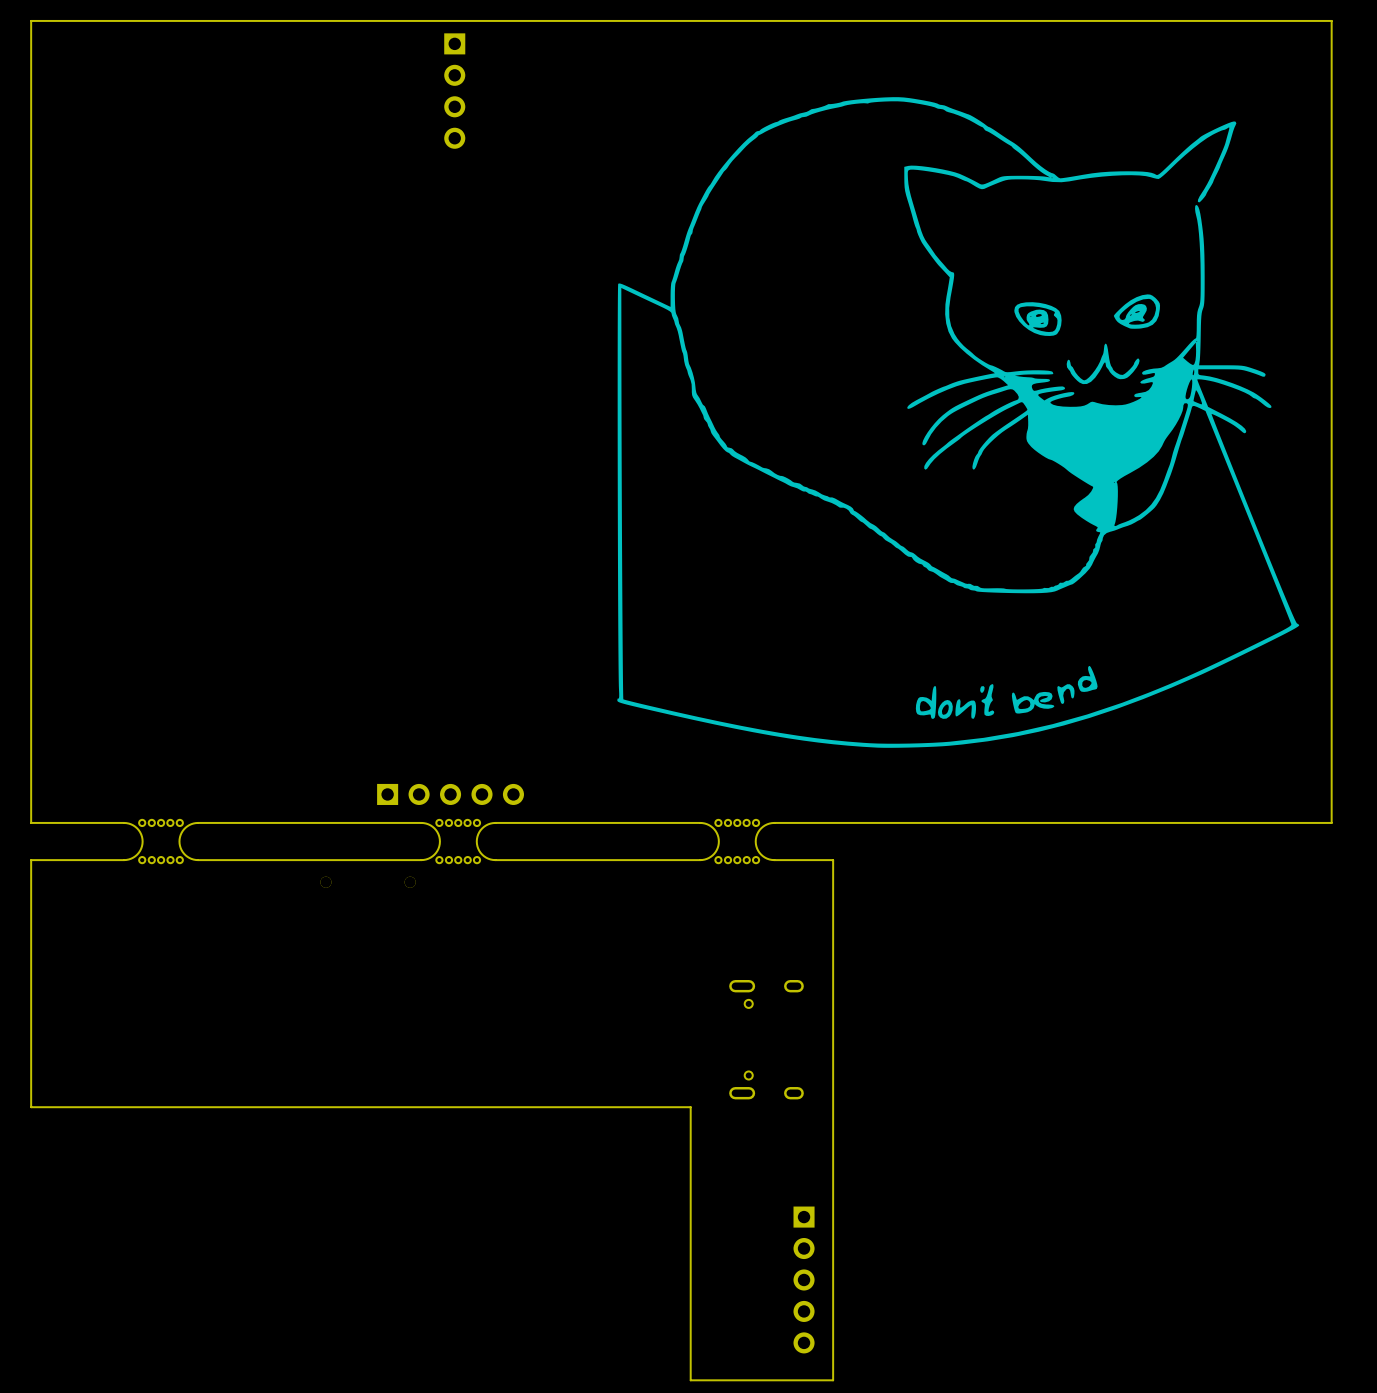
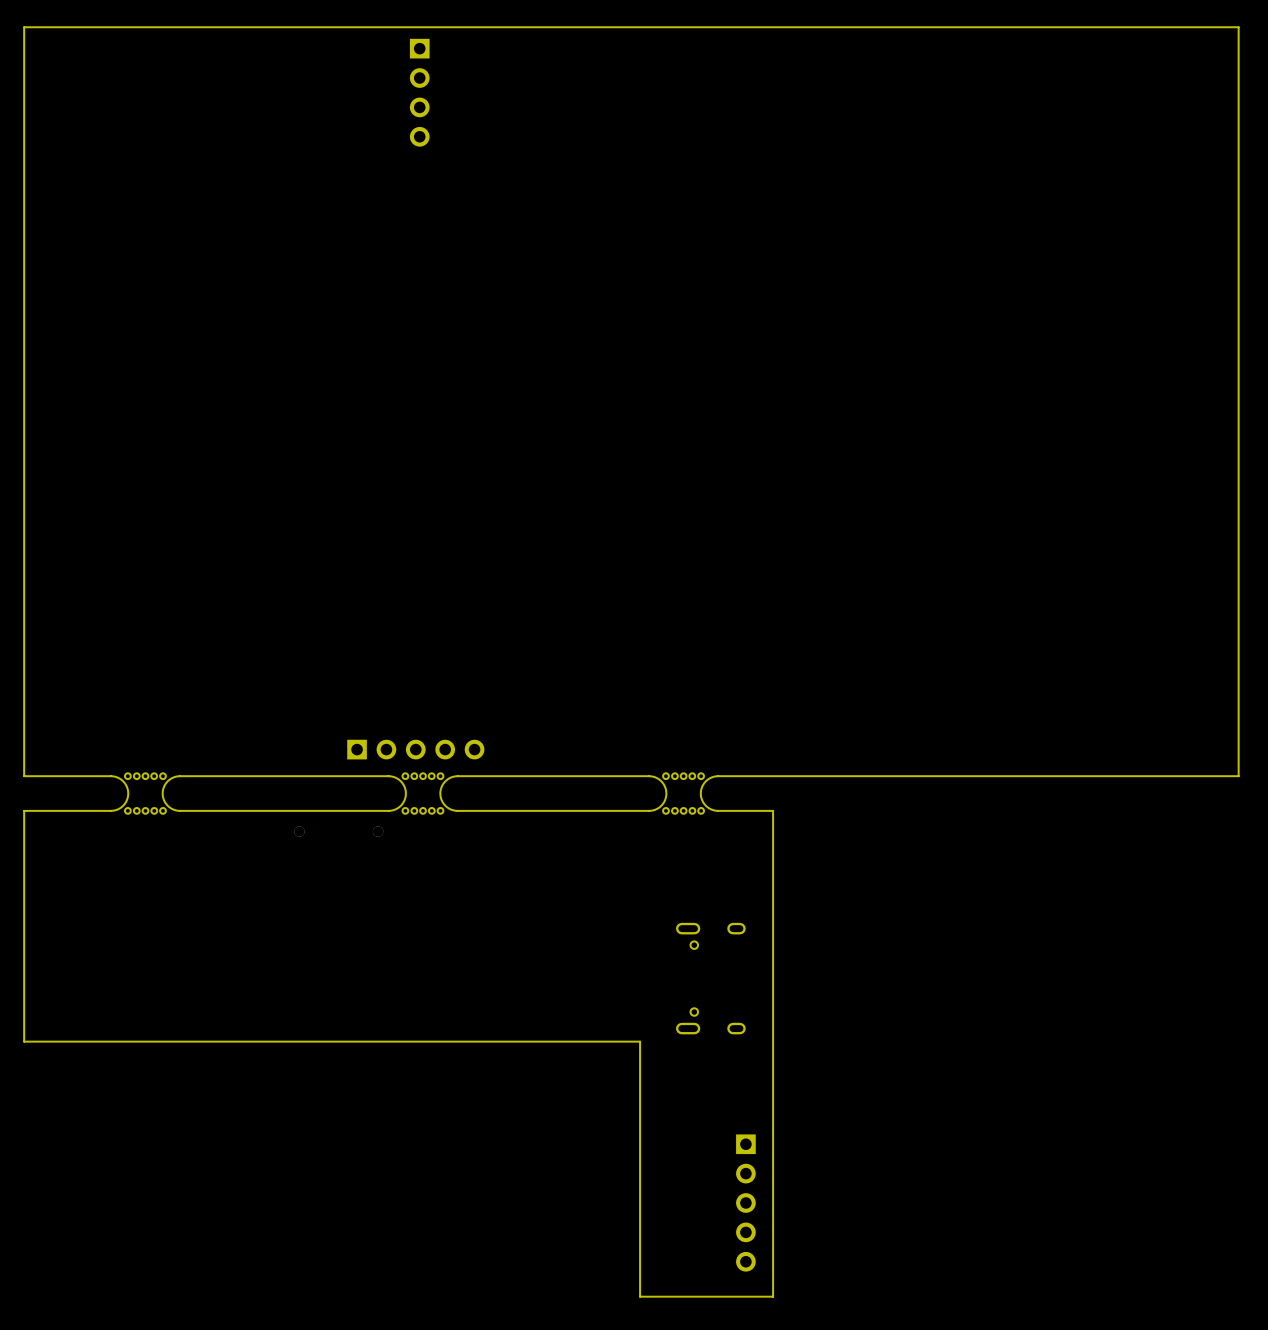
drawing: [617, 97, 1300, 748] -> none

